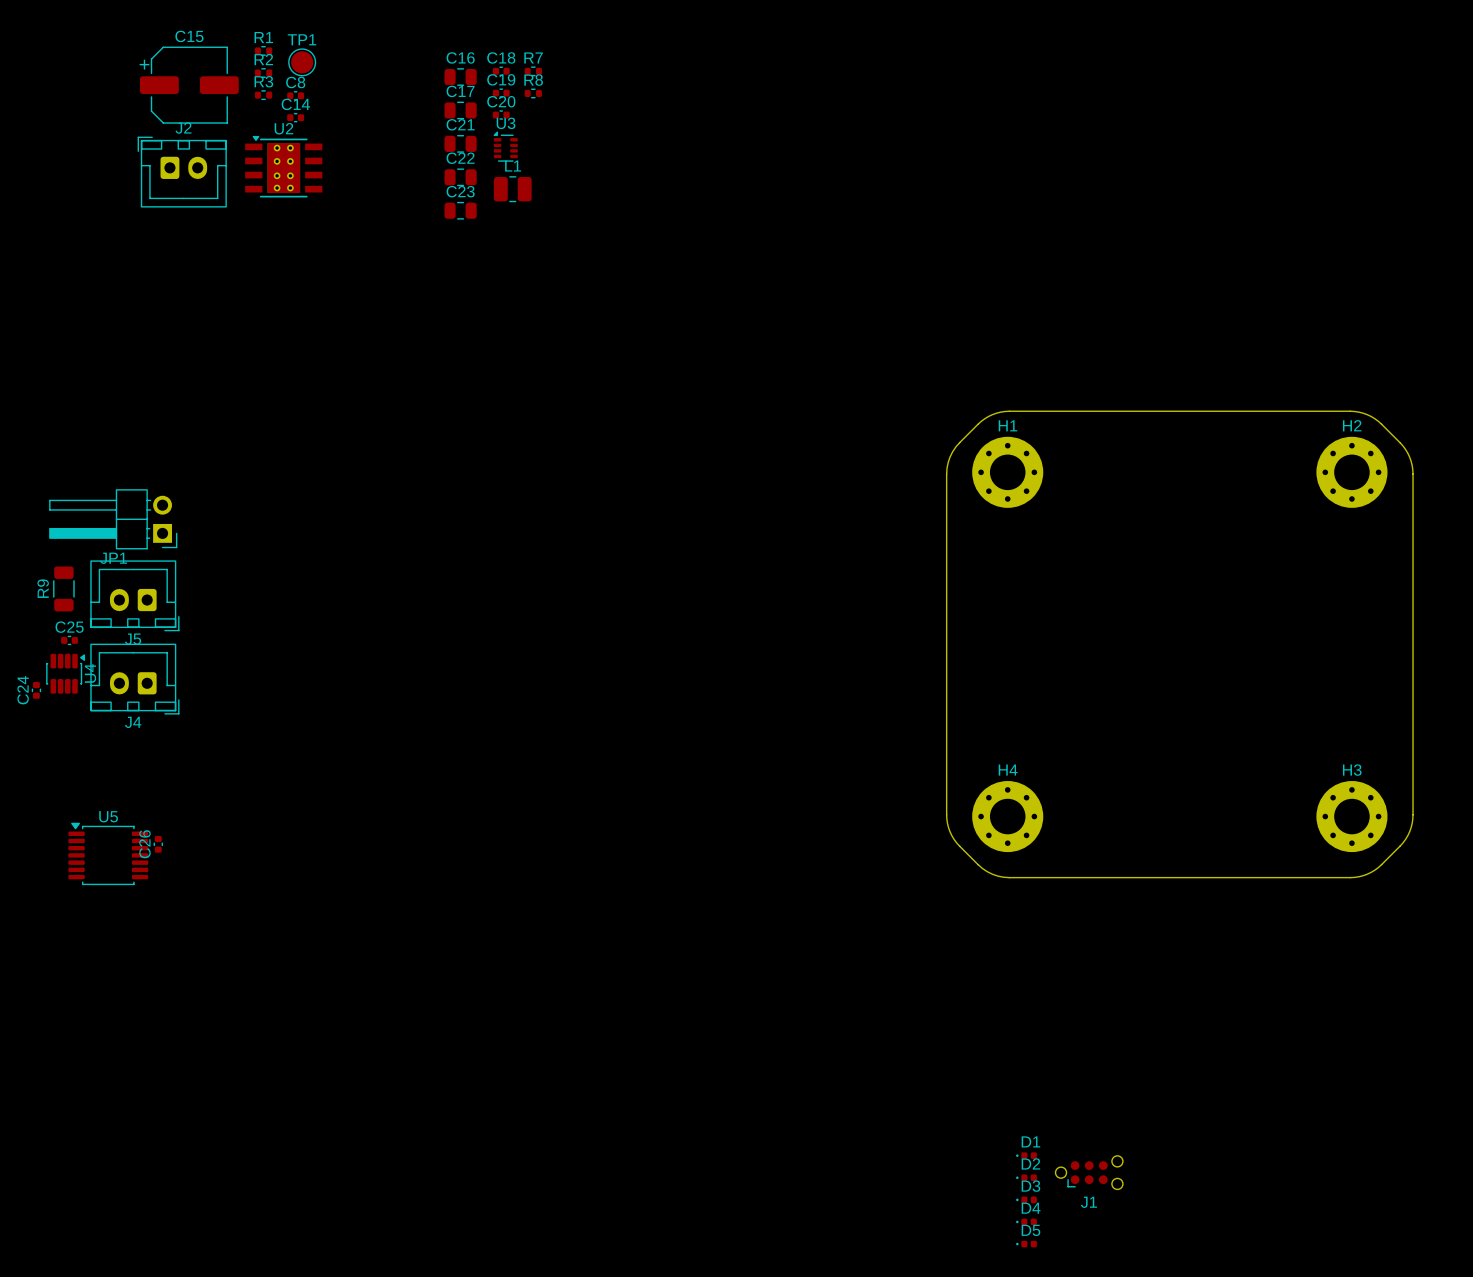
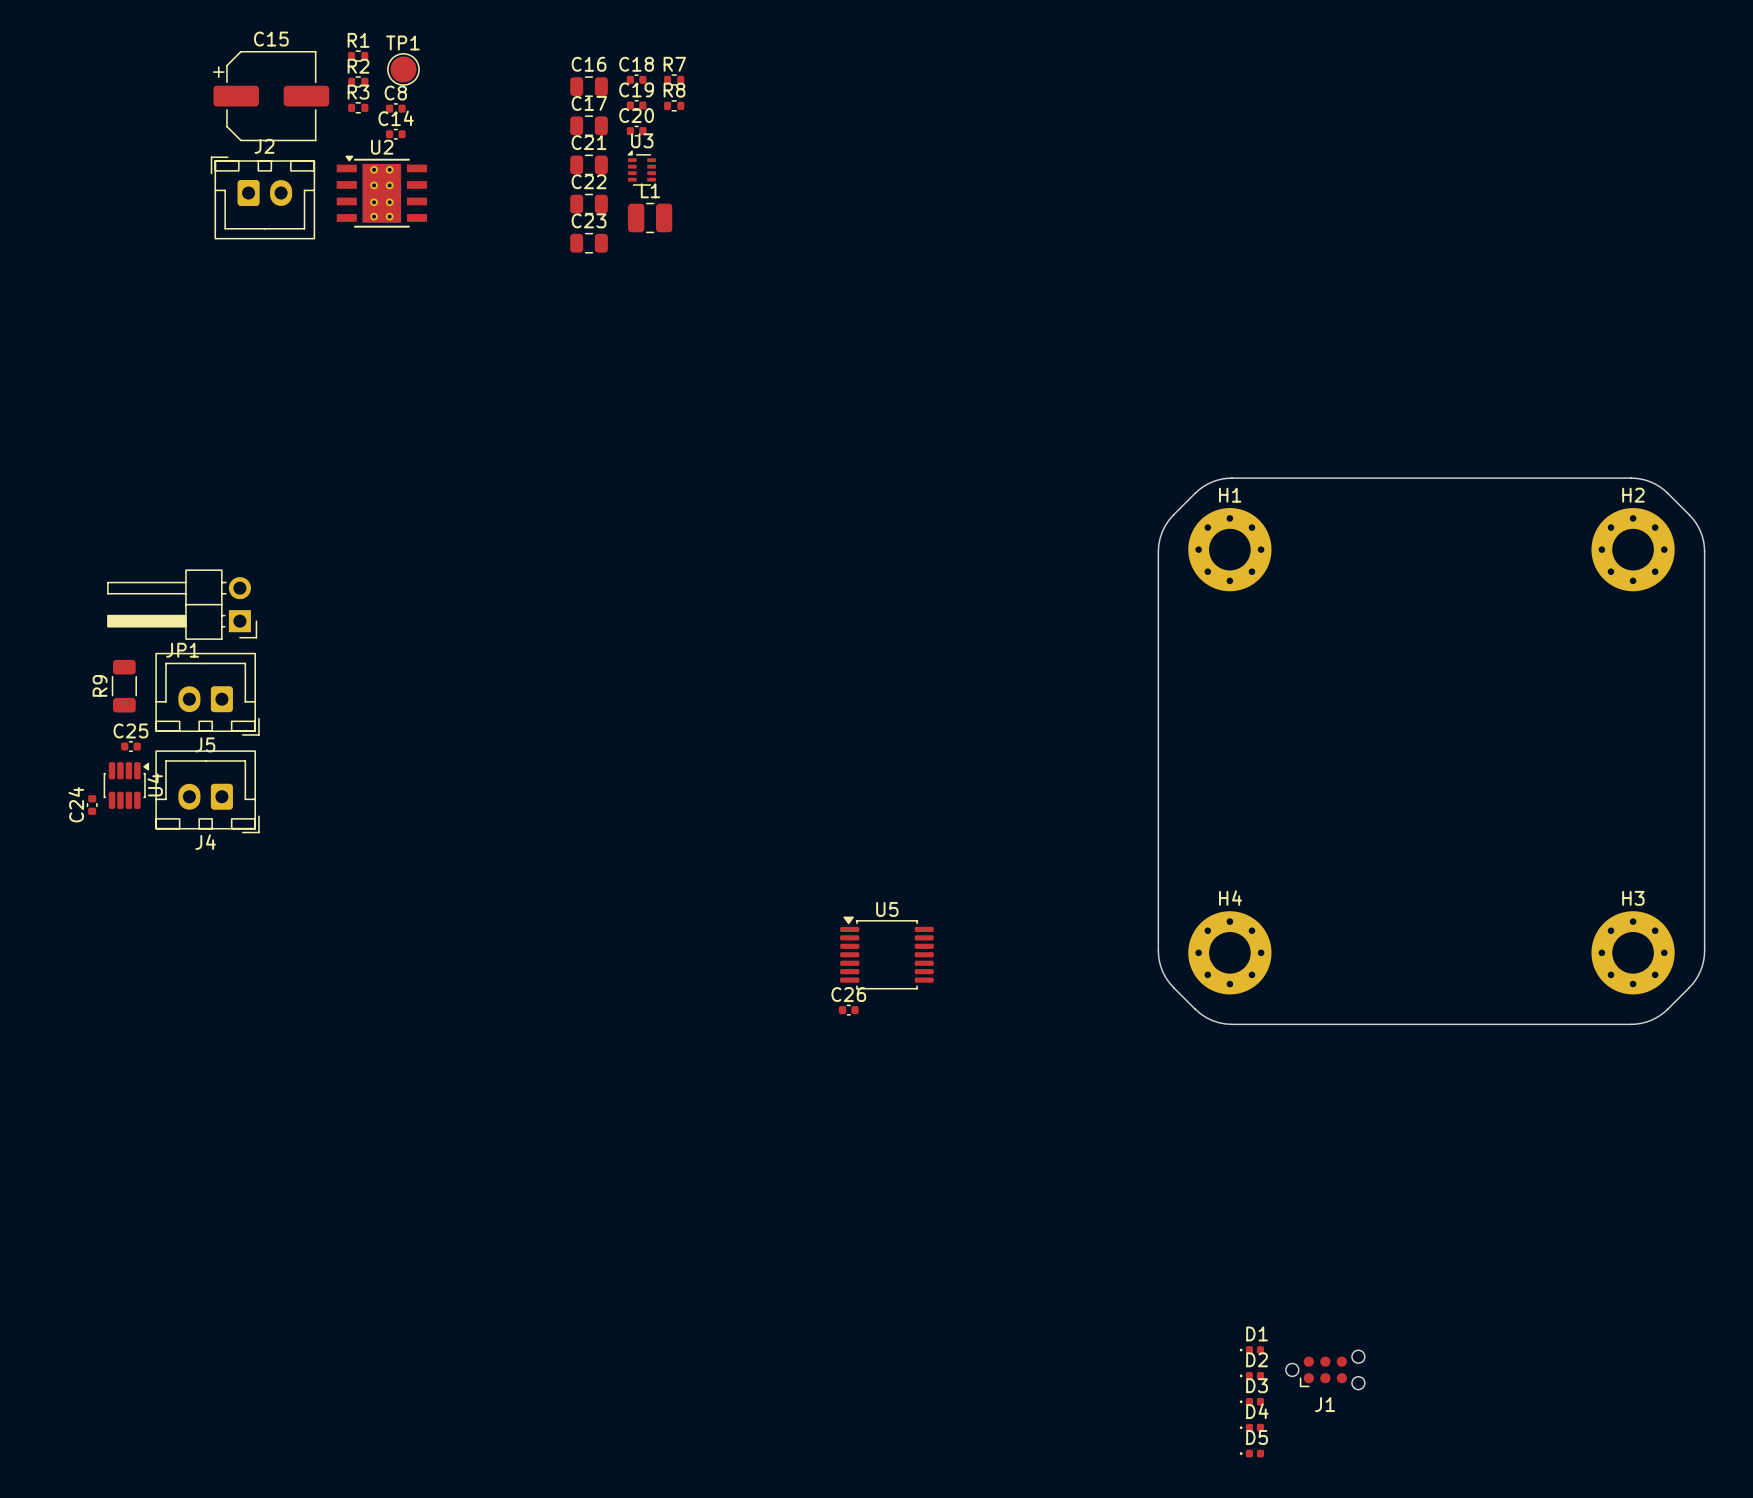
C26 rotation: 0° (158, 844) -> 90° clockwise (848, 1010)
C26 position: (158, 844) -> (848, 1010)
U5 position: (108, 853) -> (887, 953)

